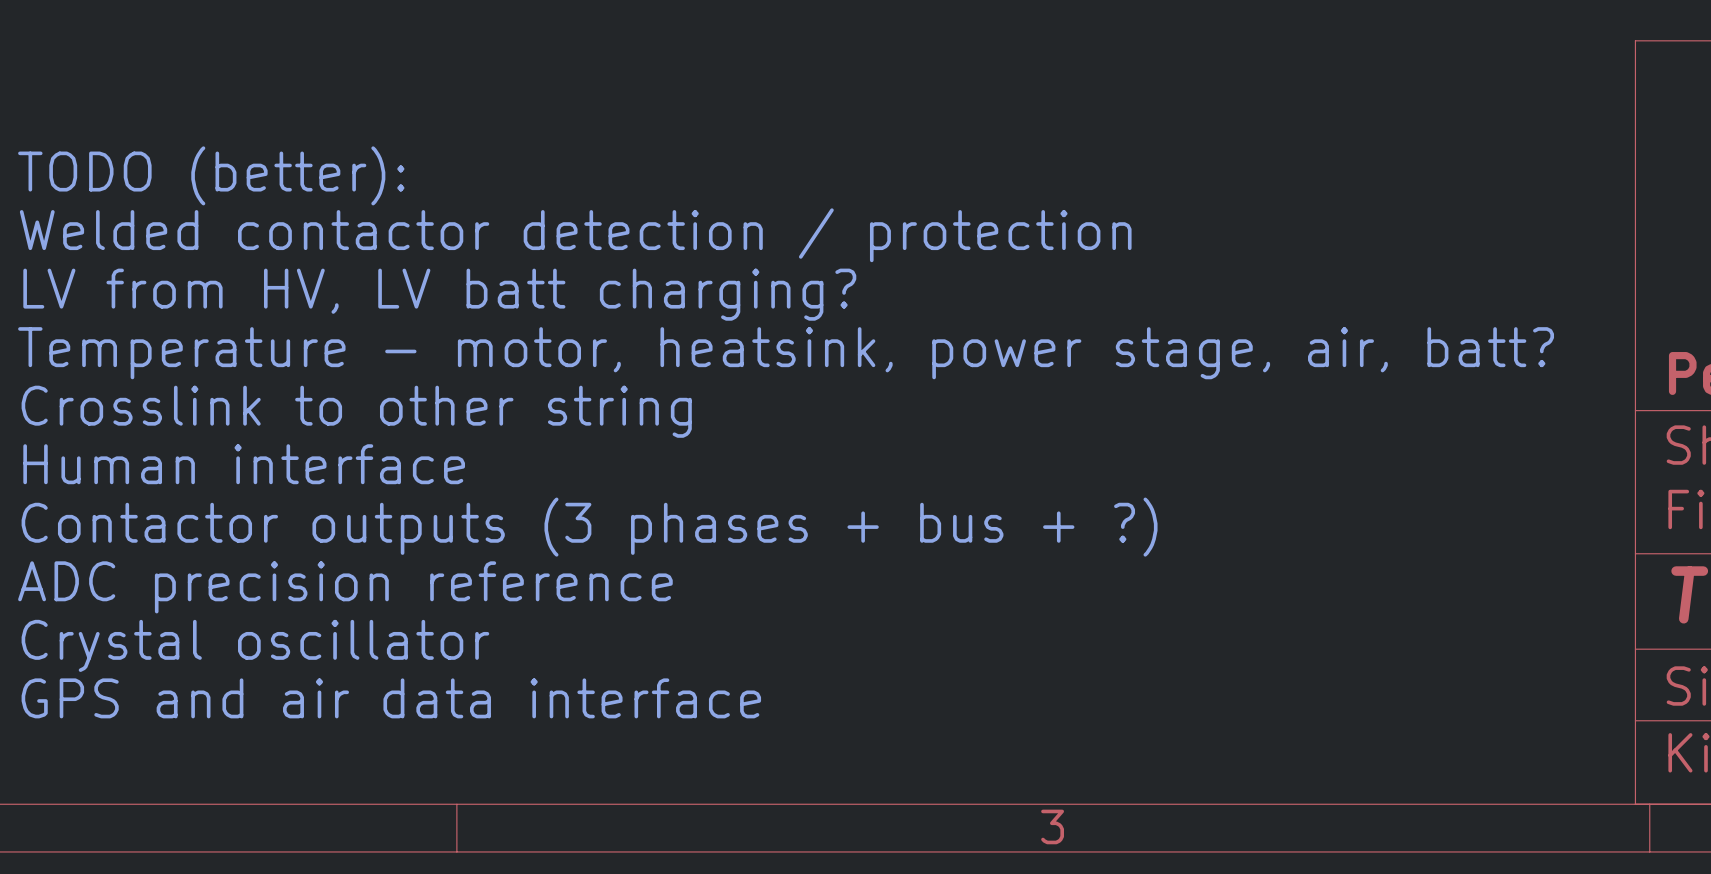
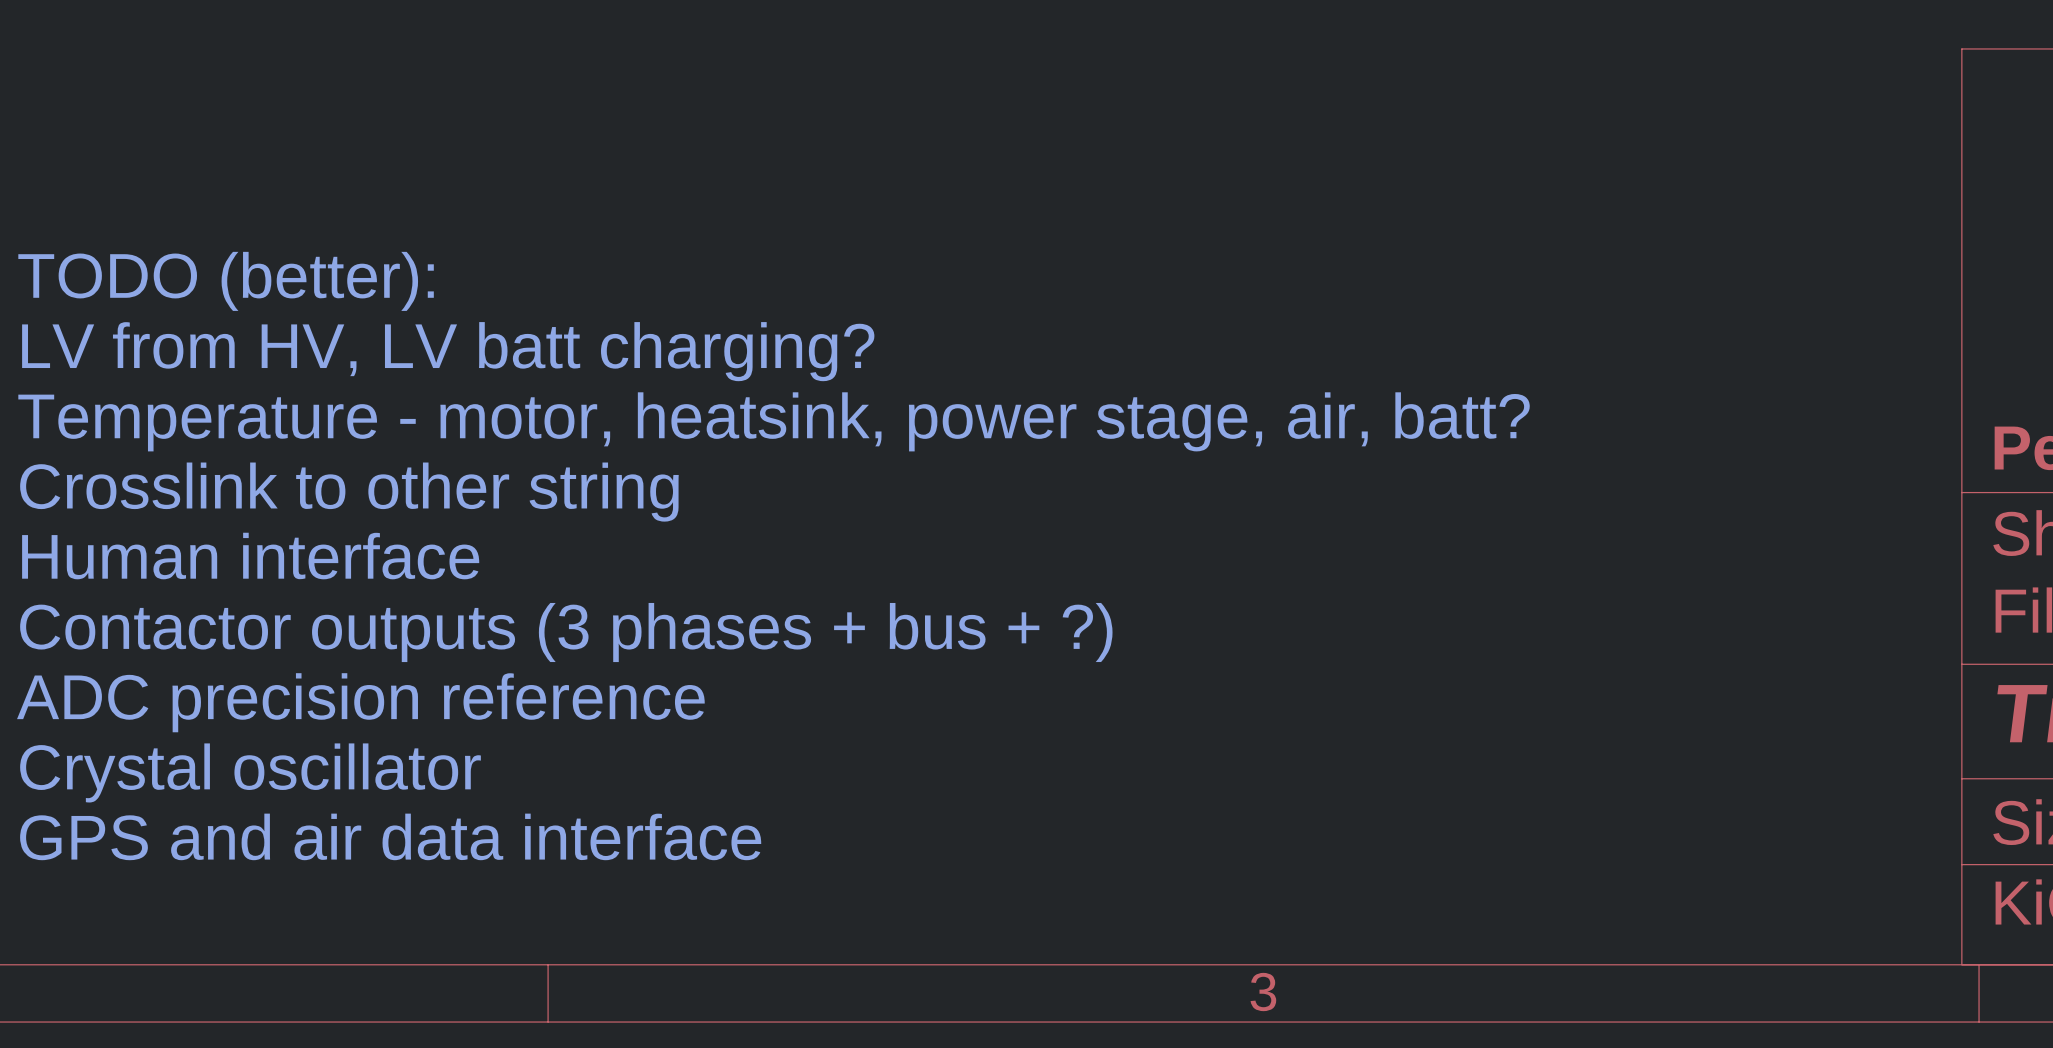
text: TODO (better): (211, 175) -> none
text: Welded contactor detection / protection (575, 235) -> TODO (better): (226, 281)

